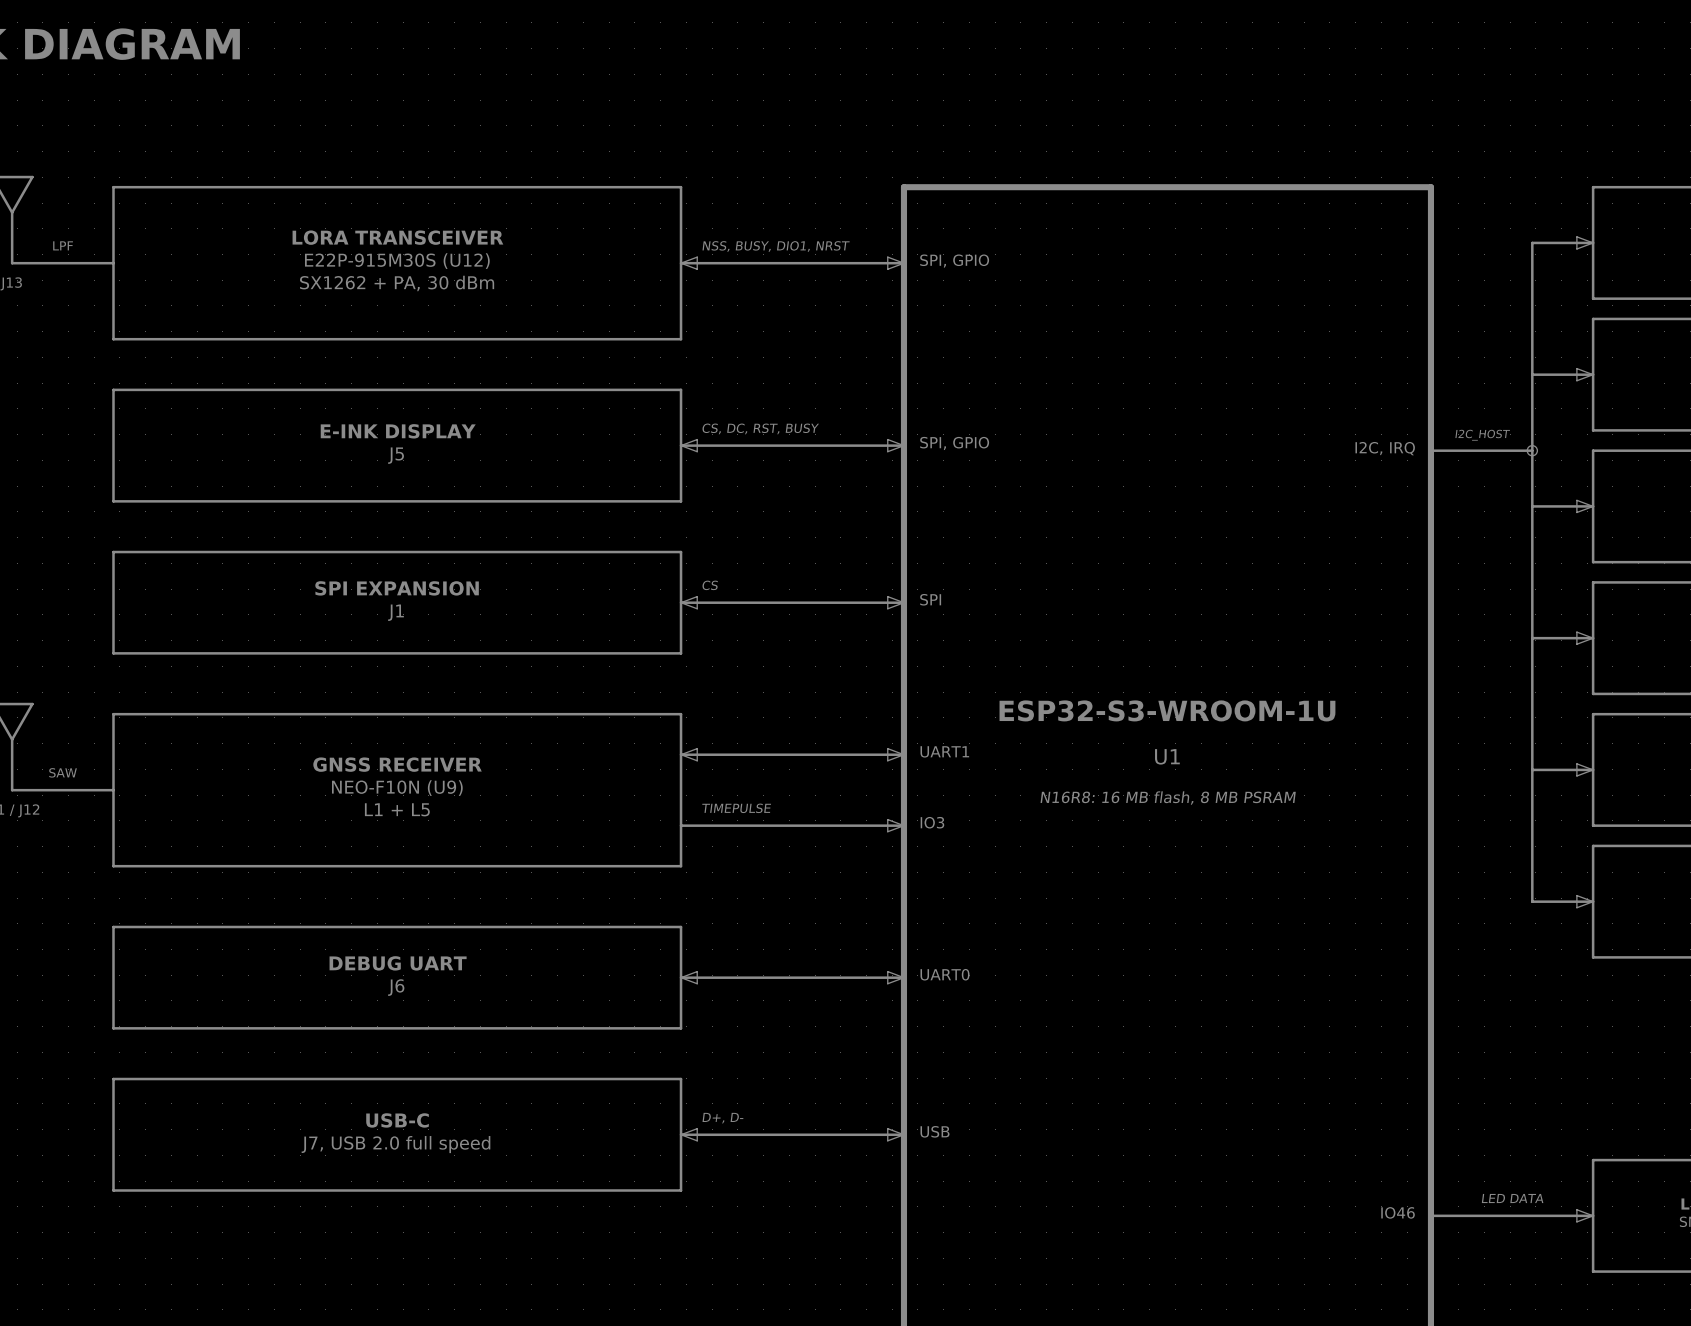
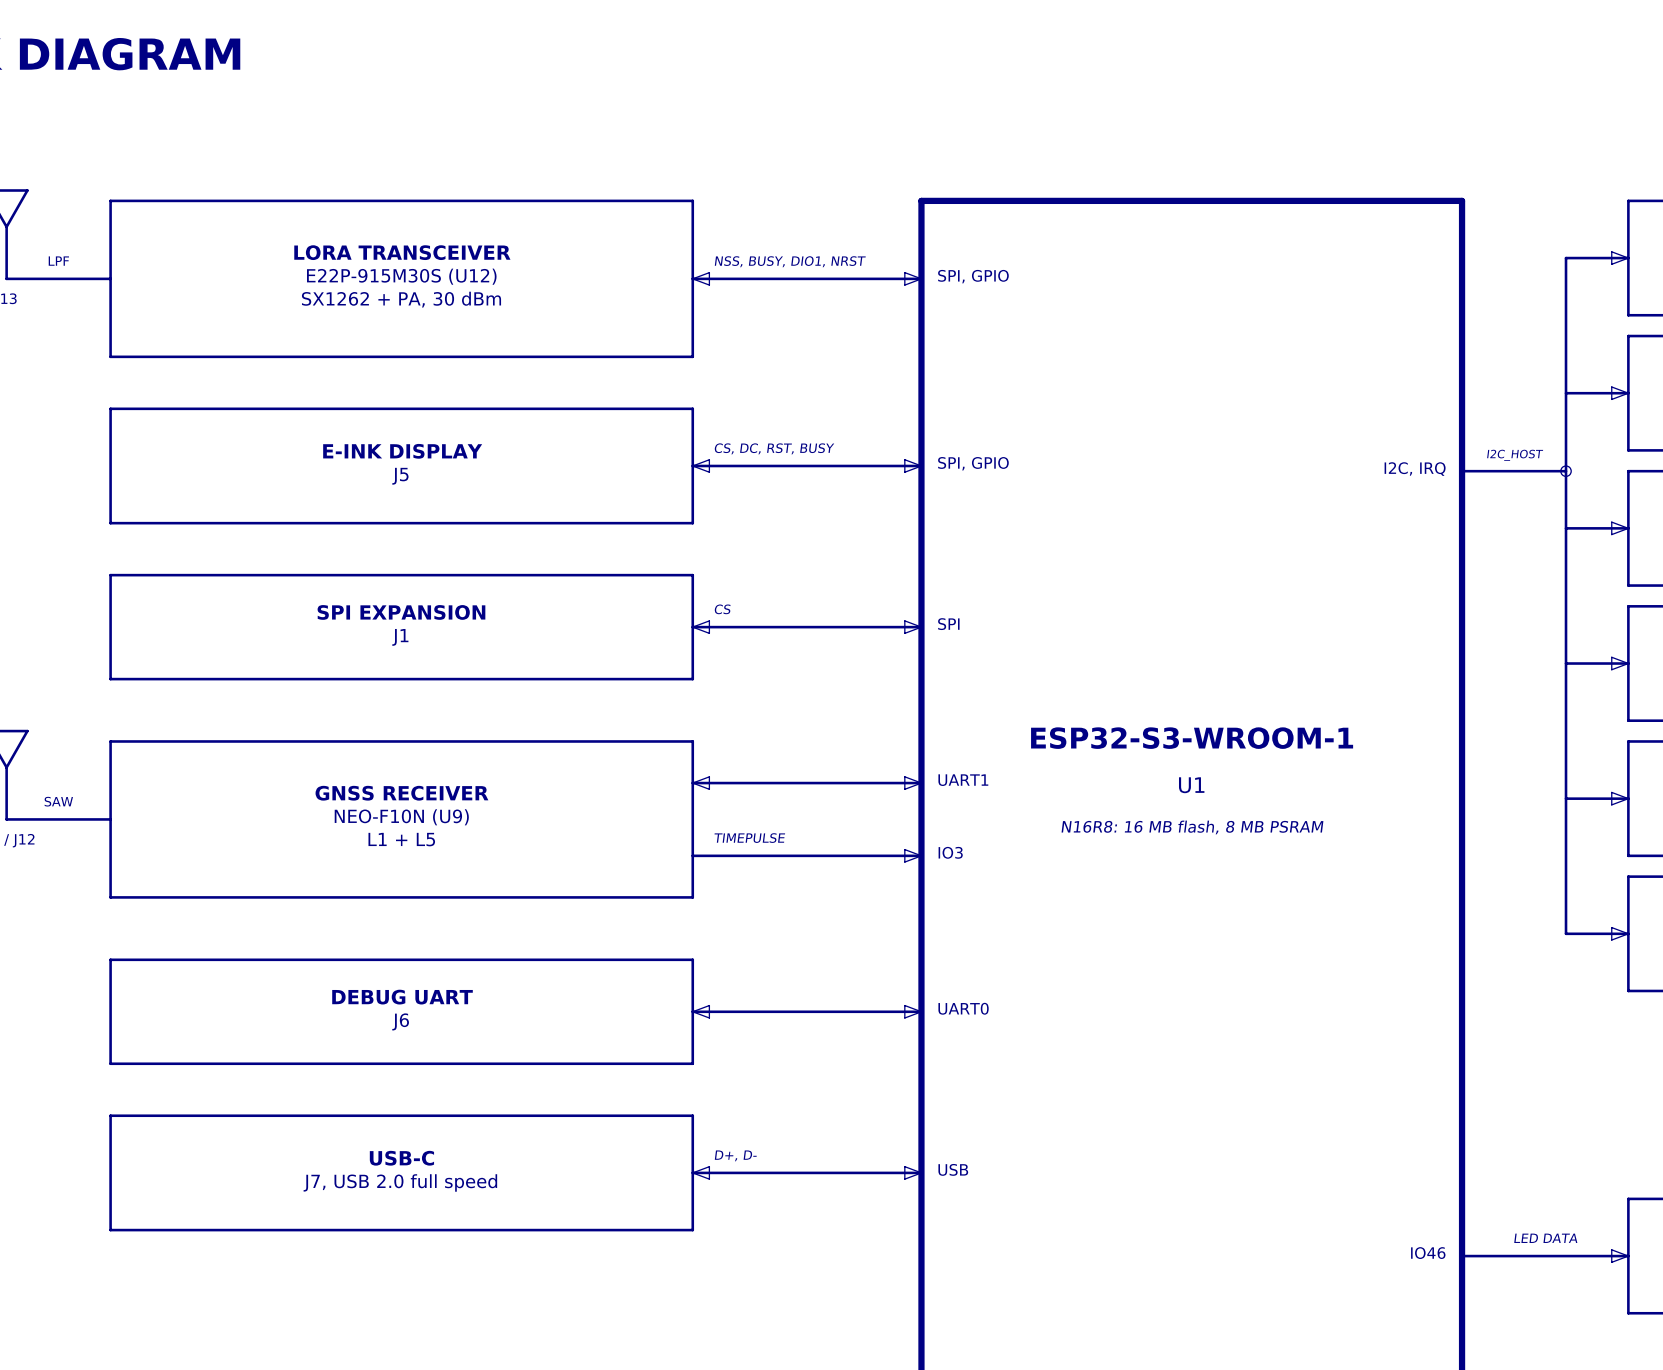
text: ESP32-S3-WROOM-1U (1167, 710) -> ESP32-S3-WROOM-1 (1192, 738)

